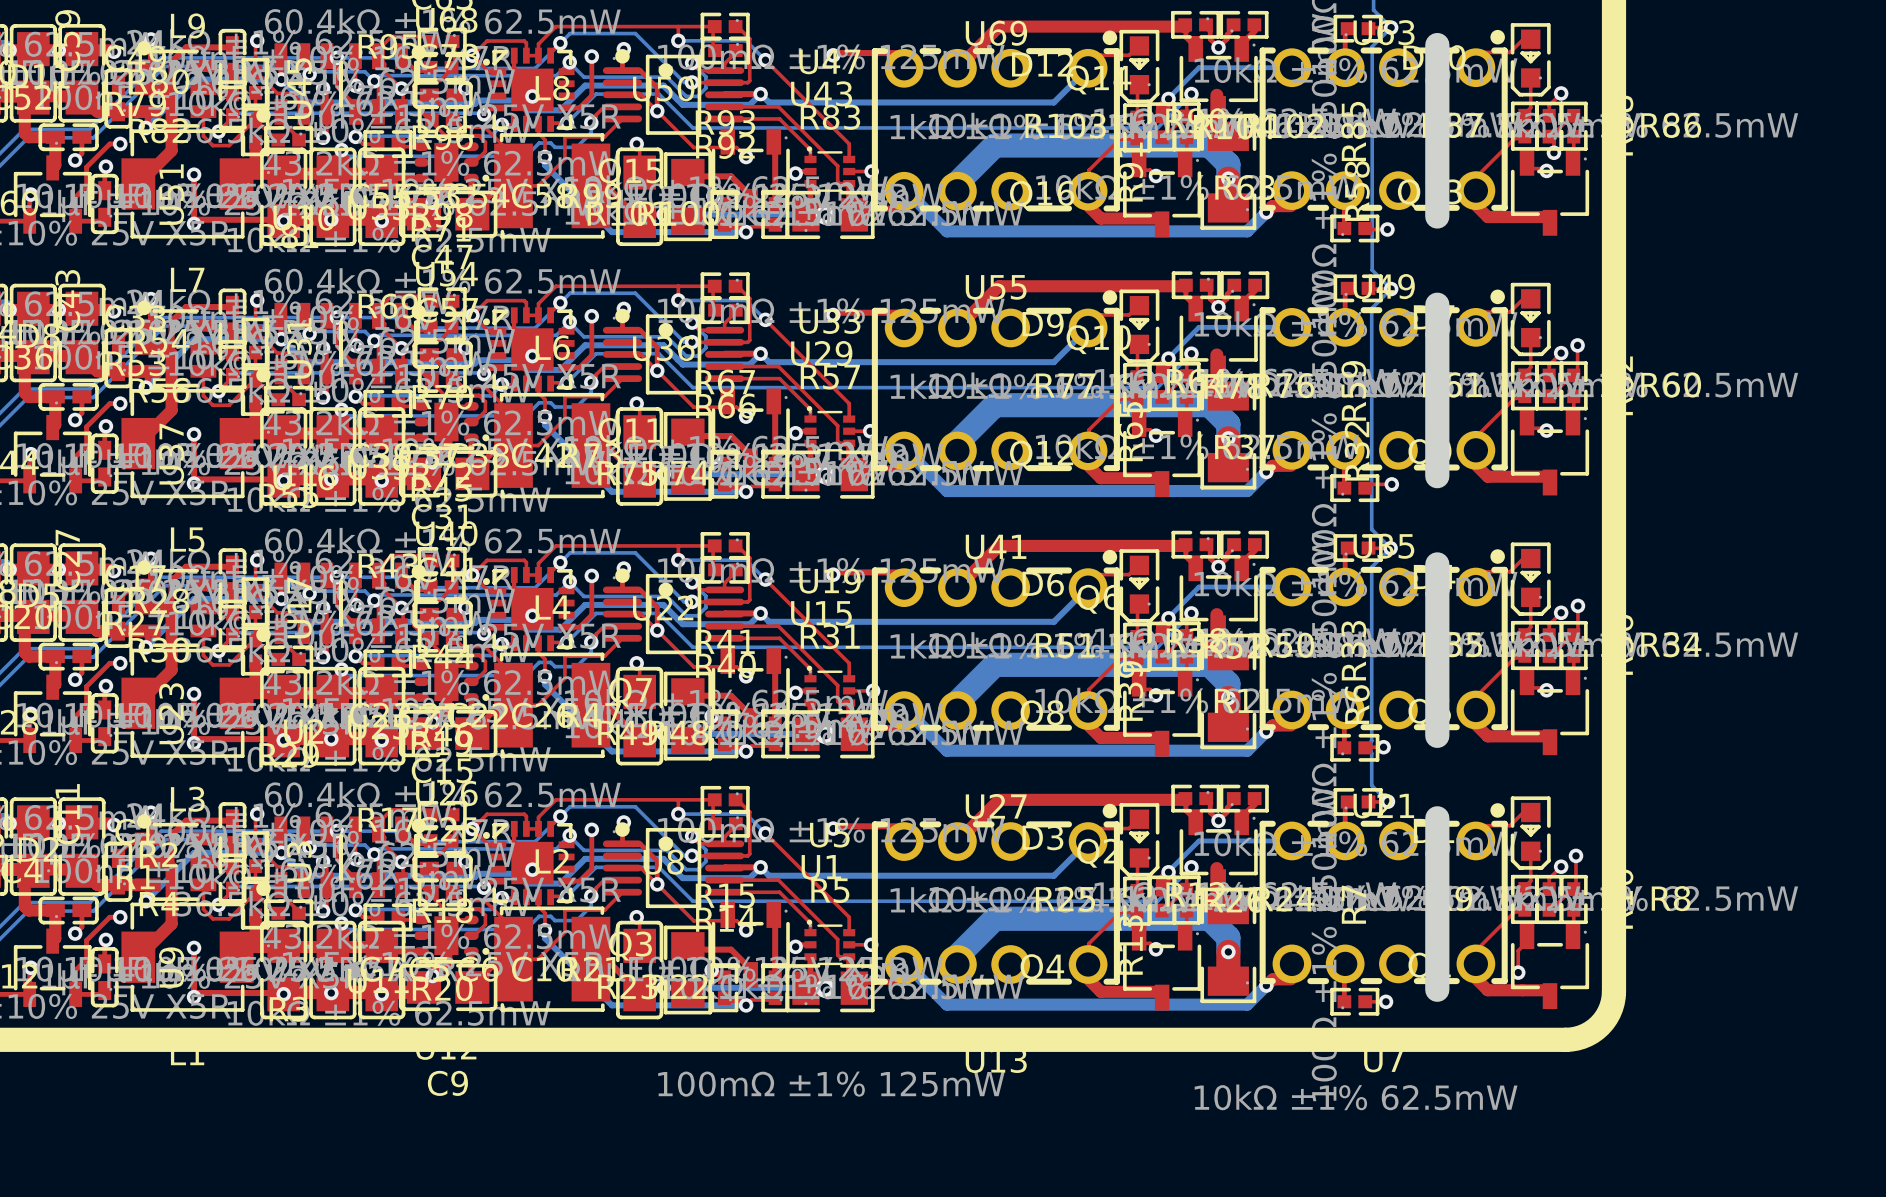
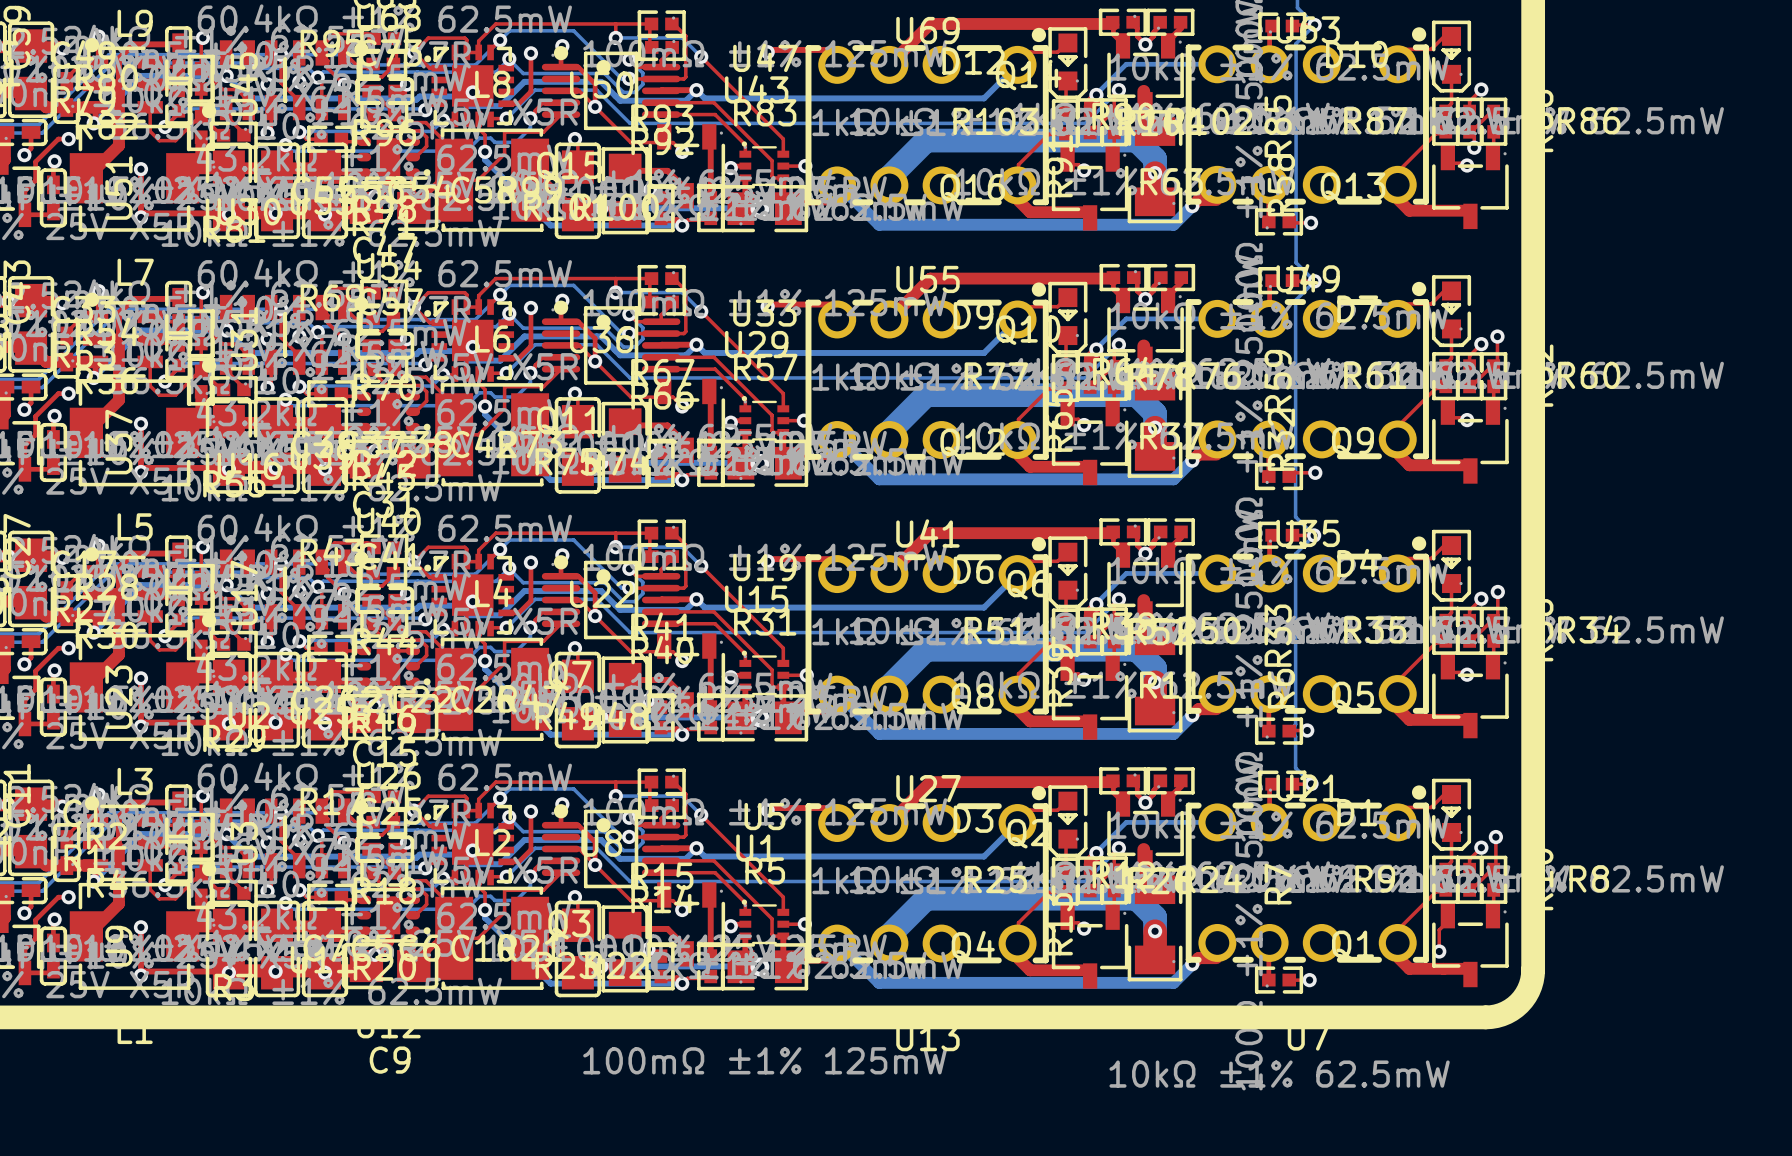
board edge: (1437, 45) (1437, 216) -> none
board edge: (1437, 304) (1437, 476) -> none
board edge: (1437, 564) (1437, 735) -> none
board edge: (1437, 818) (1437, 989) -> none

